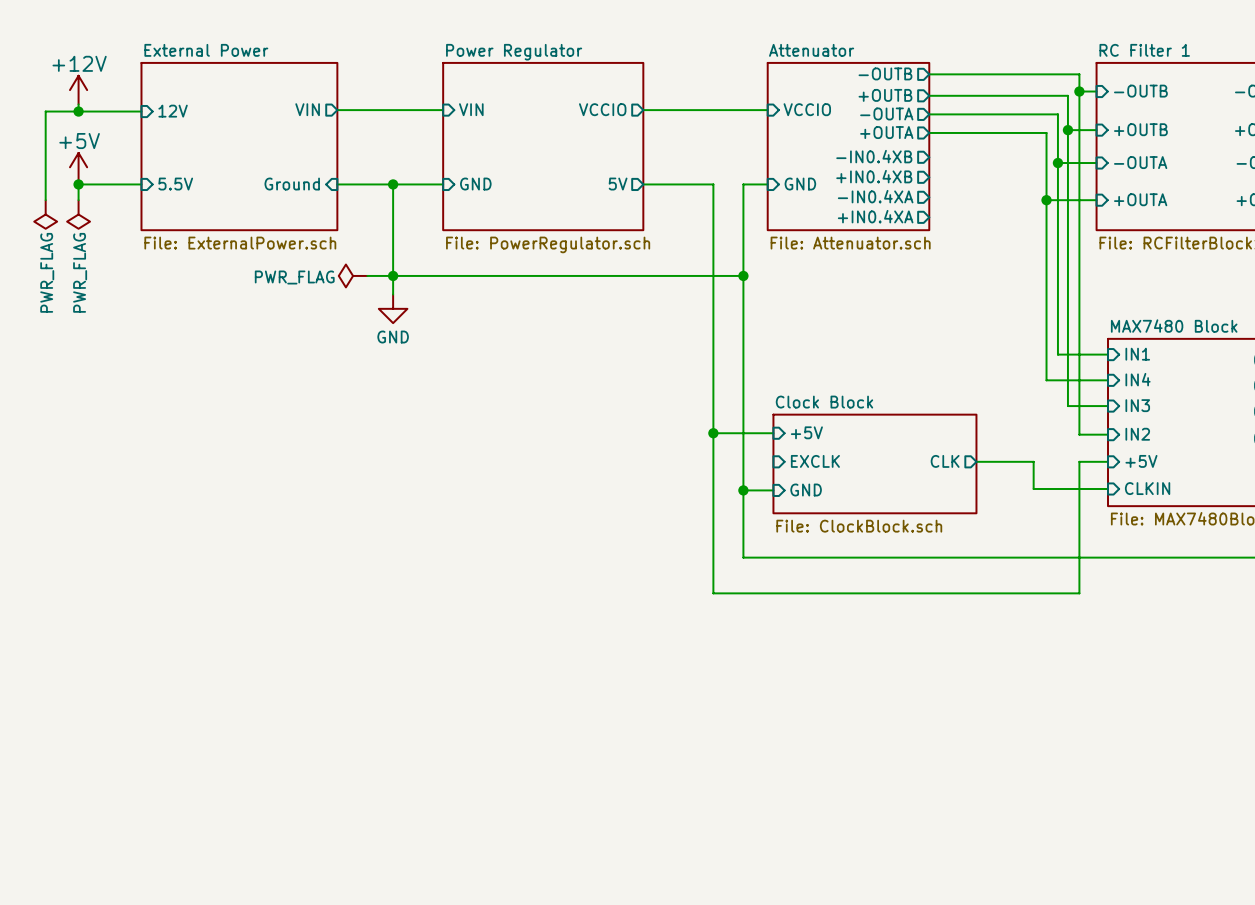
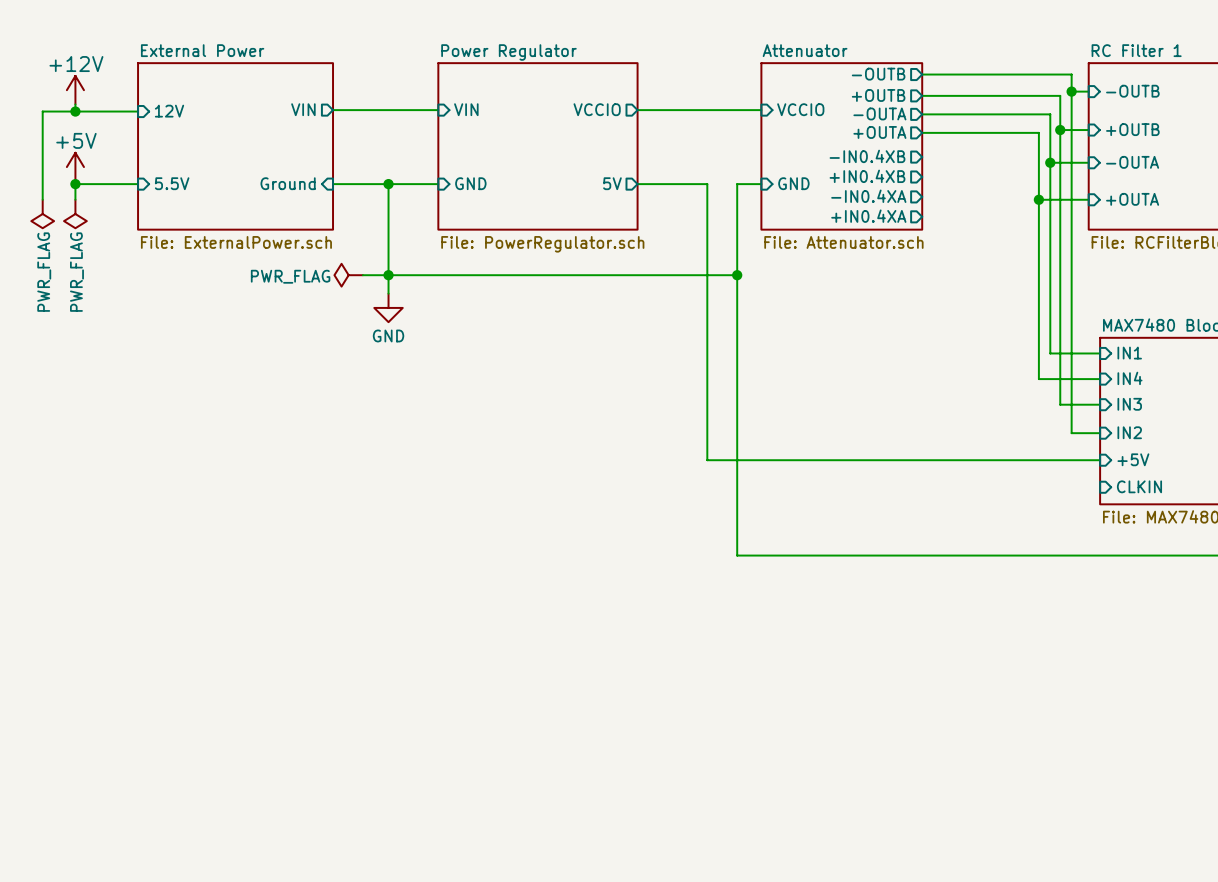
sheet pin: +5V (806, 432) -> none
wire: (713, 433) (773, 433) -> none
junction: (713, 433) -> none
wire: (713, 461) (713, 593) (1079, 593) (1079, 461) -> (707, 460) (969, 460)
sheet pin: EXCLK (815, 461) -> none
sheet pin: CLK (945, 461) -> none
wire: (1033, 461) (1033, 488) (1108, 488) -> (1026, 460) (1071, 460)
sheet Clock Block: File: ClockBlock.sch (874, 463) -> none
wire: (743, 490) (773, 490) -> none
junction: (743, 490) -> none
sheet pin: GND (806, 490) -> none

